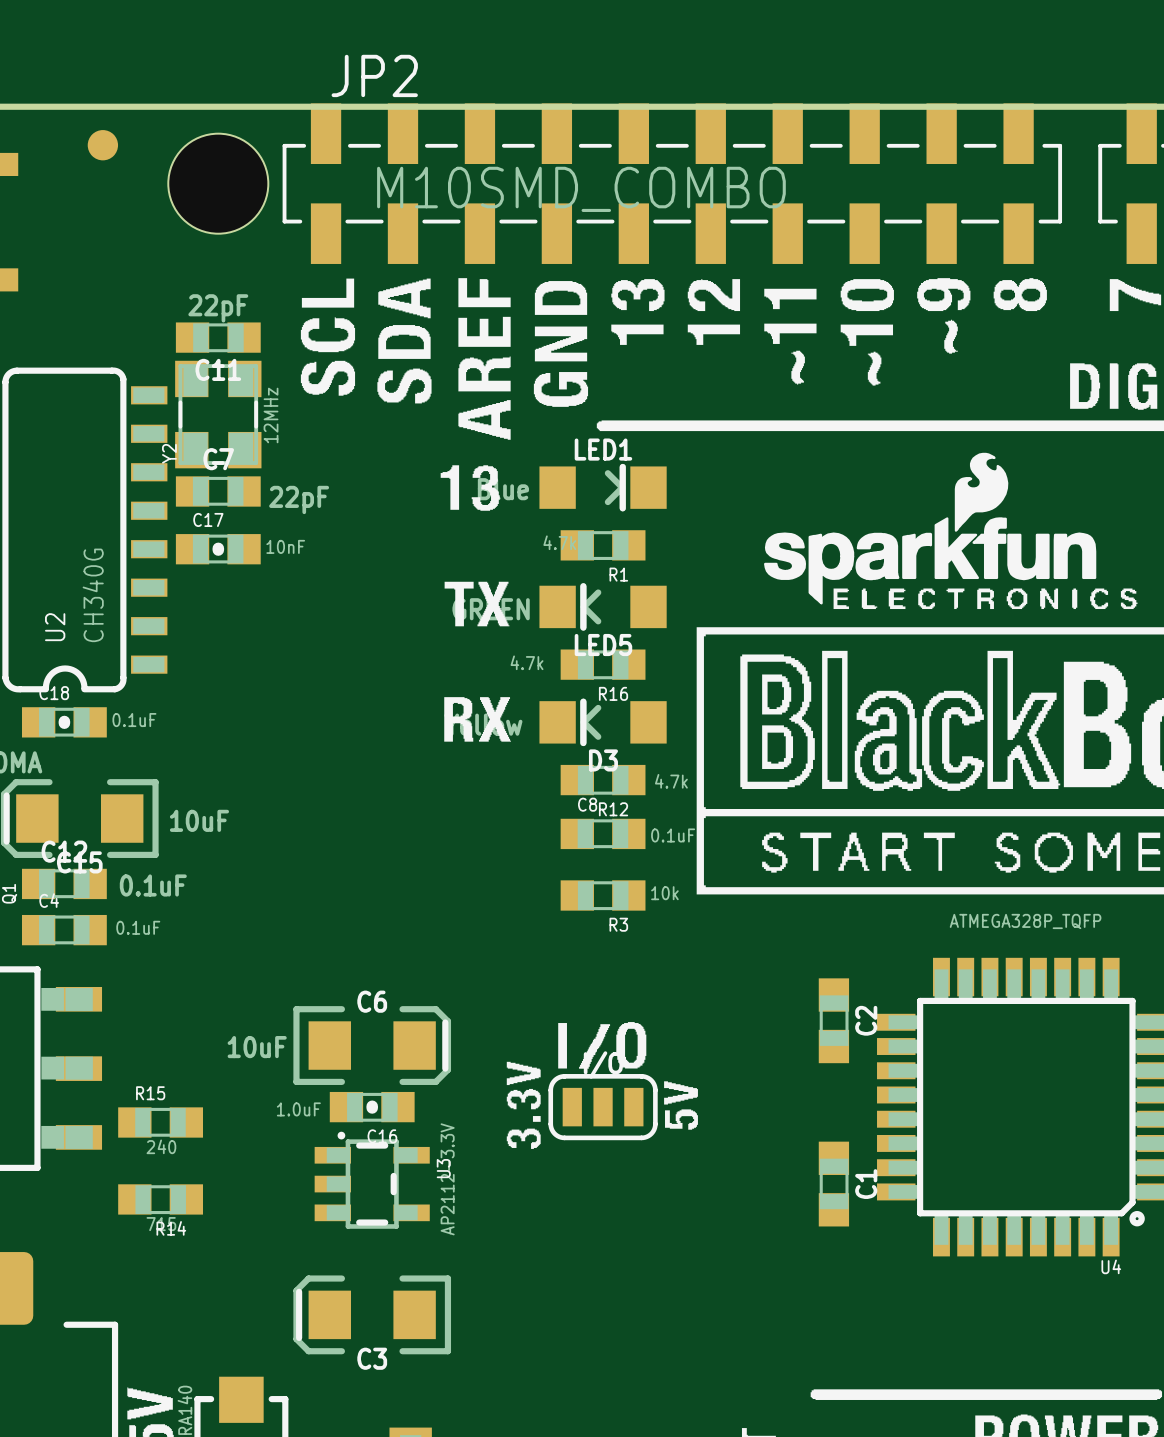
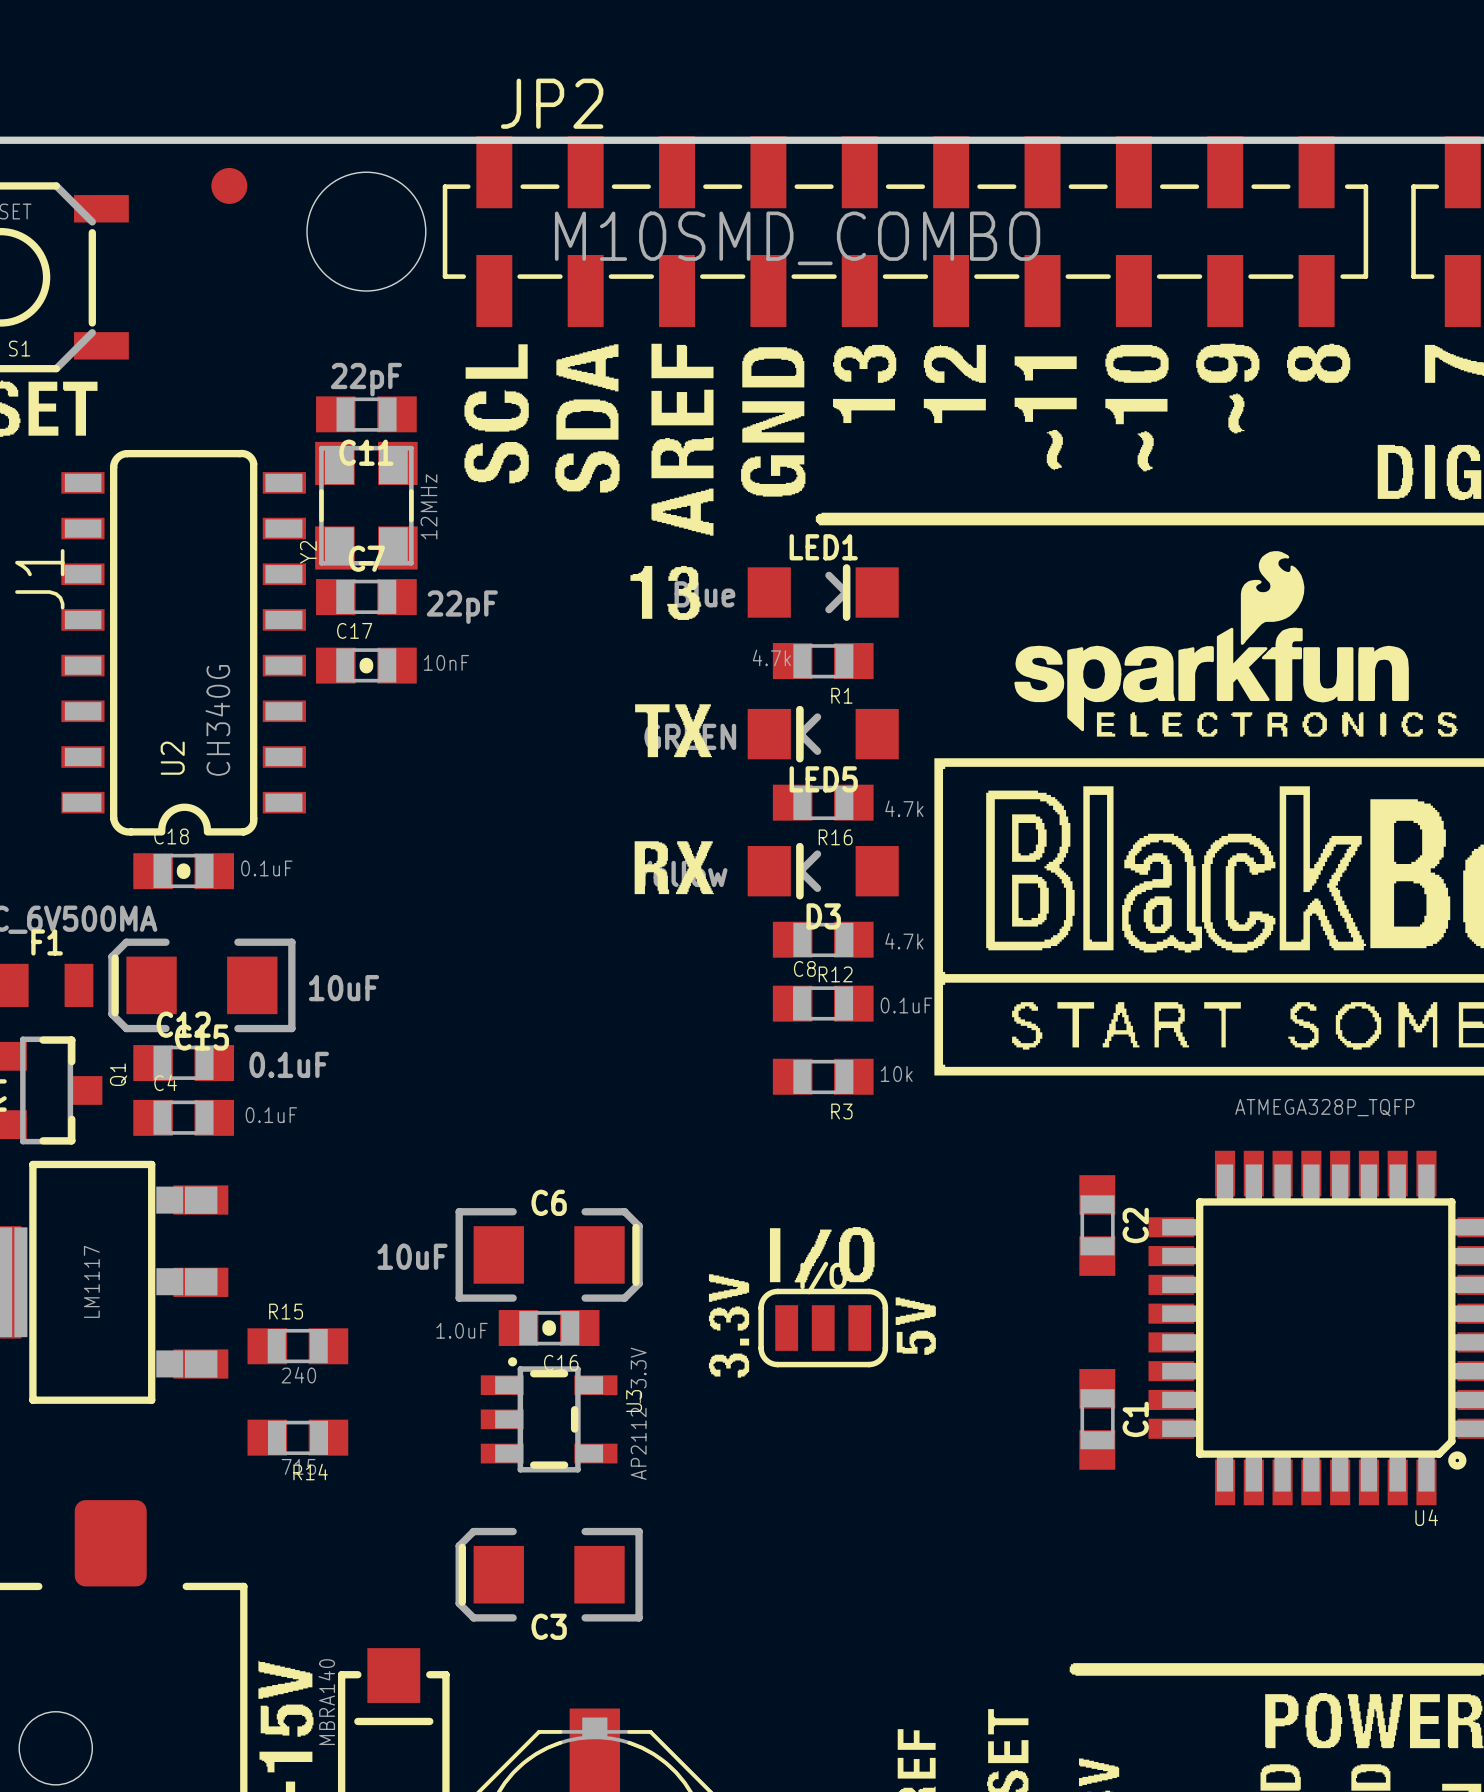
R16 value position: 4.7k (527, 662) -> 4.7k (904, 808)

